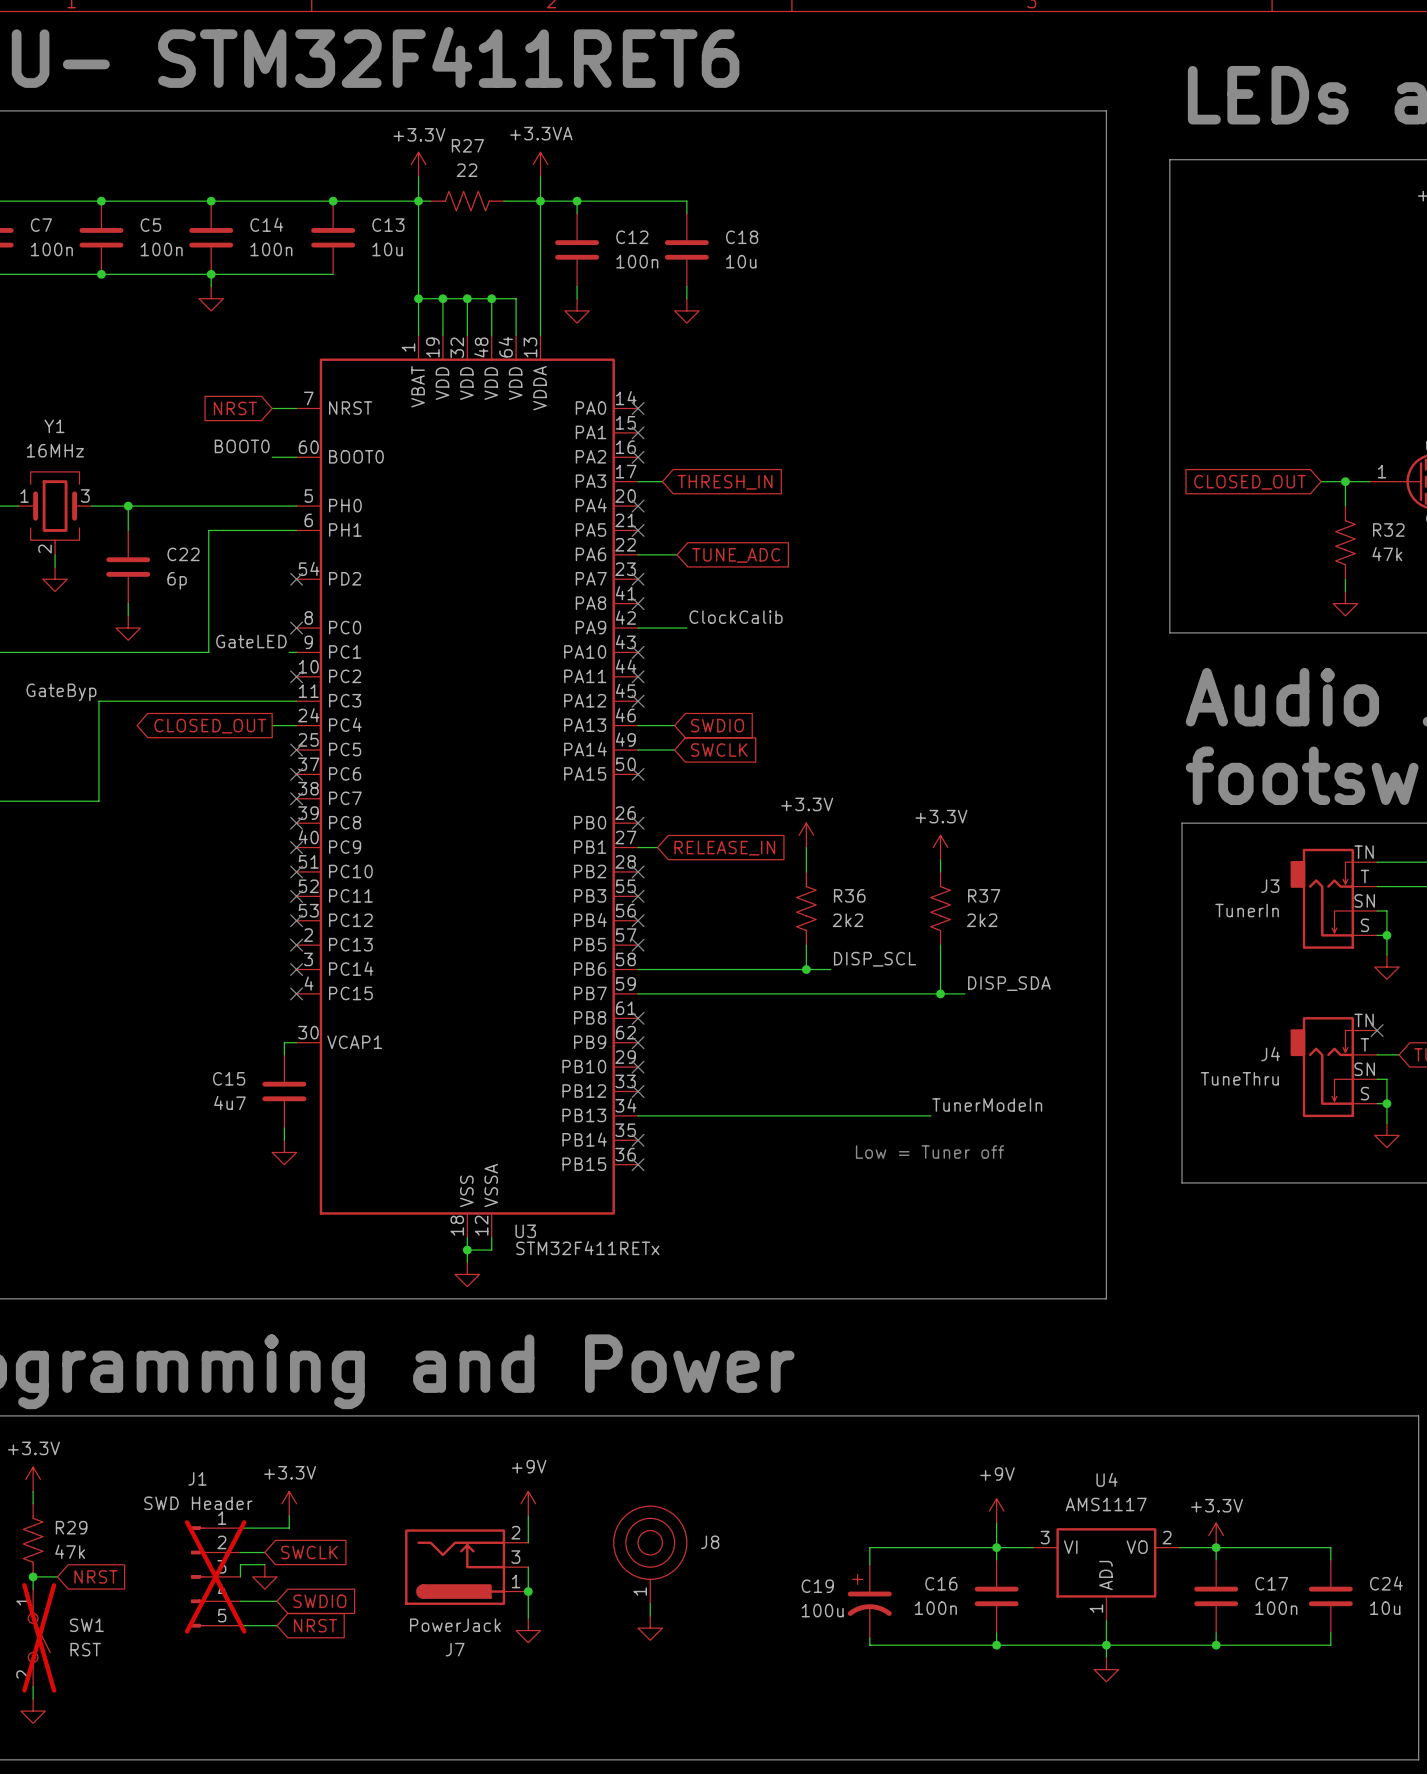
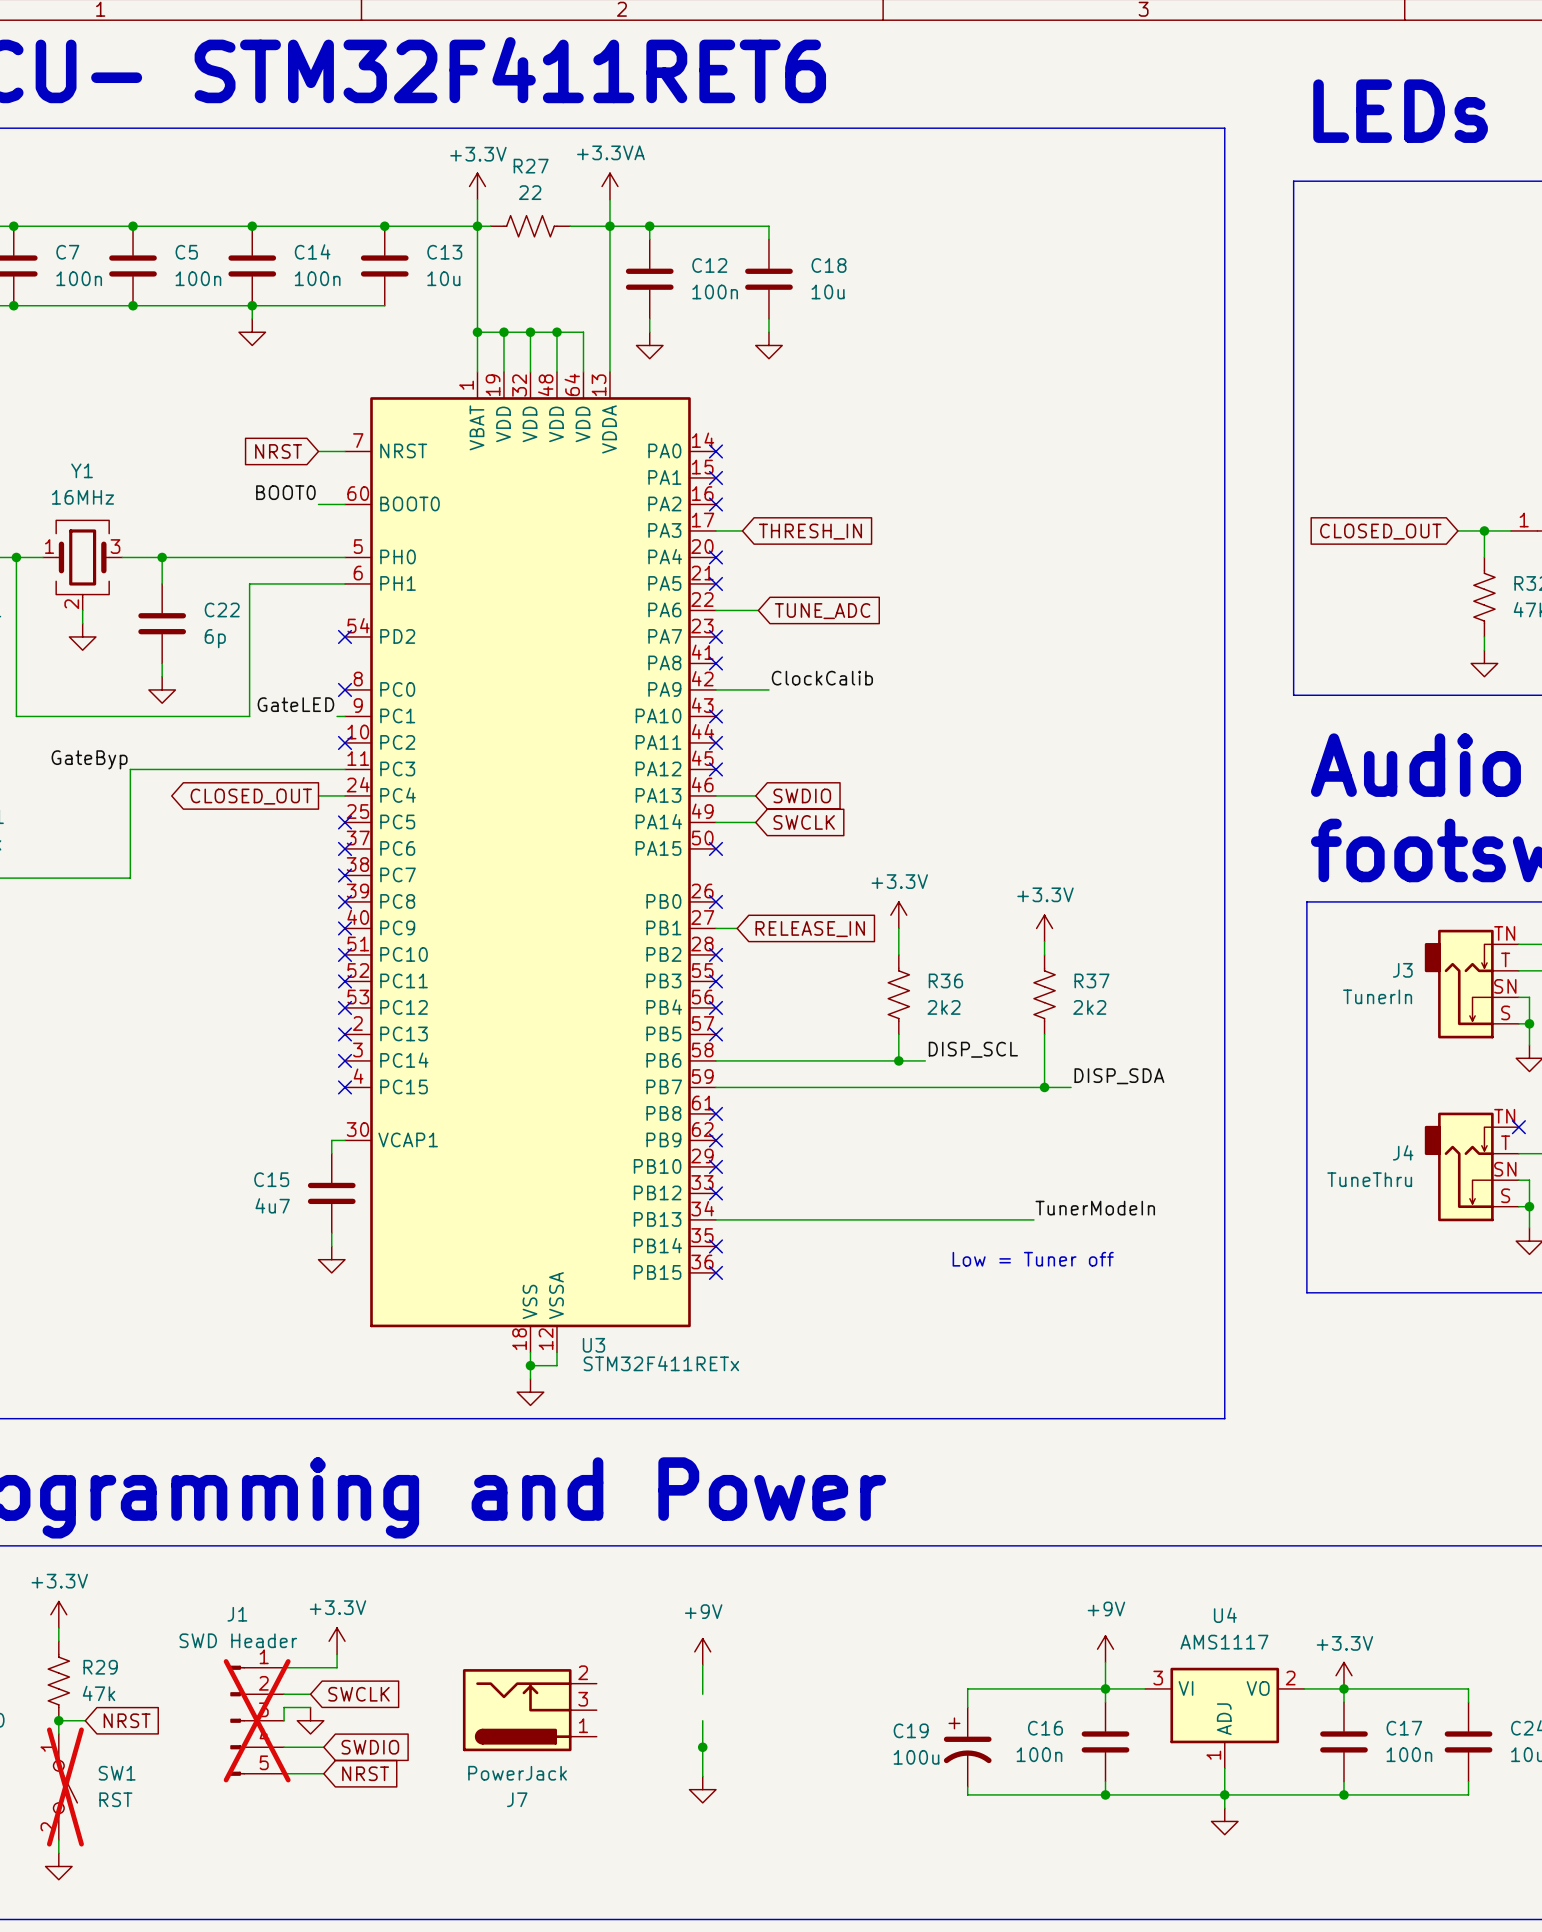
power symbol position: +9V (528, 1503) -> +9V (702, 1651)
wire: (528, 1515) (528, 1542) -> (702, 1665) (702, 1694)
J8: (650, 1554) -> none
wire: (528, 1567) (528, 1618) -> (702, 1720) (702, 1776)
junction: (528, 1591) -> none
junction: none -> (702, 1747)
wire: (650, 1603) (650, 1615) -> none
power symbol position: (650, 1628) -> (702, 1789)
power symbol: (528, 1630) -> none

